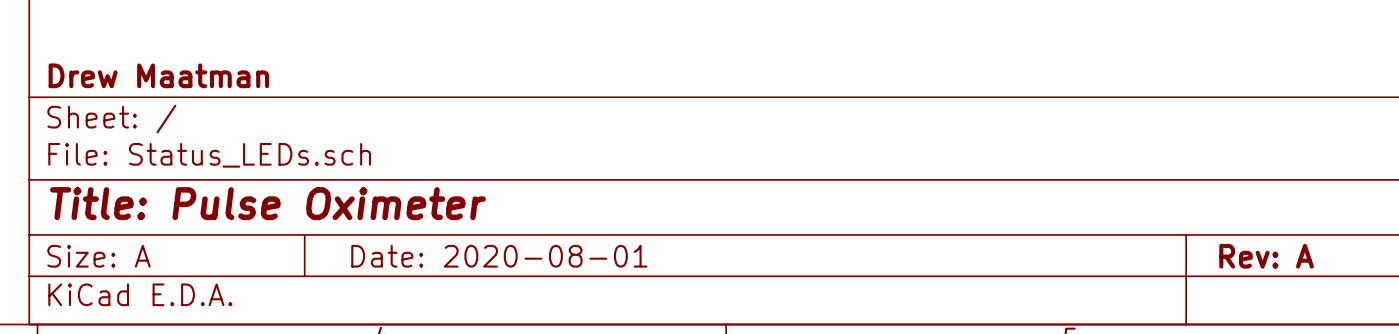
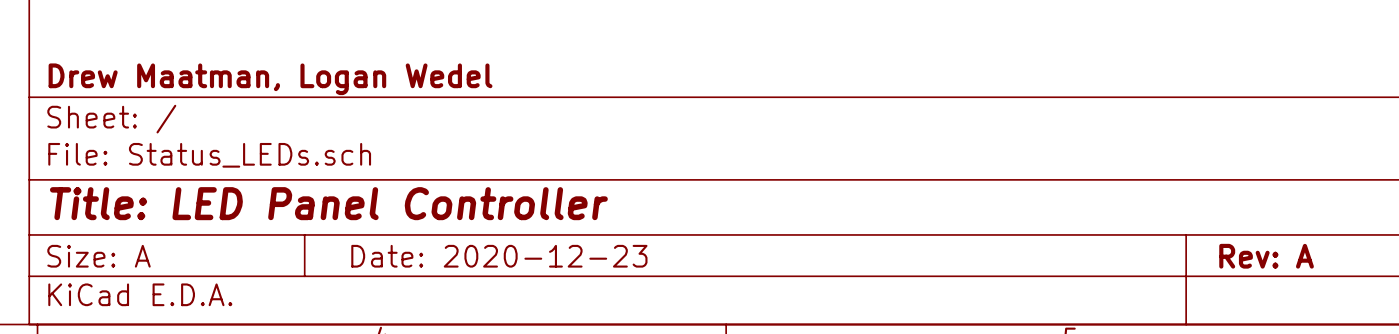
title block: Drew Maatman (158, 75) -> Drew Maatman, Logan Wedel (270, 79)
title block: Title: Pulse Oximeter (267, 203) -> Title: LED Panel Controller (328, 203)
title block: Date: 2020-08-01 (499, 256) -> Date: 2020-12-23 (499, 256)

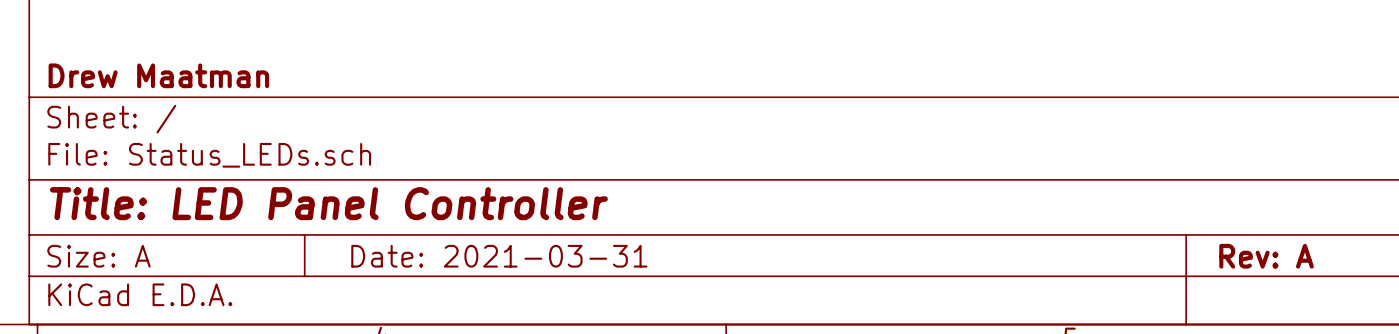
title block: Drew Maatman, Logan Wedel (270, 79) -> Drew Maatman (158, 75)
title block: Date: 2020-12-23 (499, 256) -> Date: 2021-03-31 (499, 256)

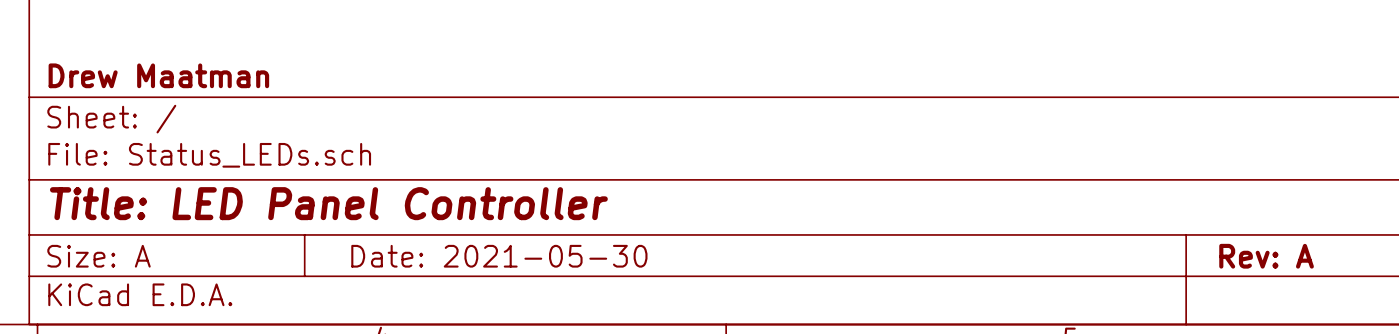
title block: Date: 2021-03-31 (499, 256) -> Date: 2021-05-30 (499, 256)

